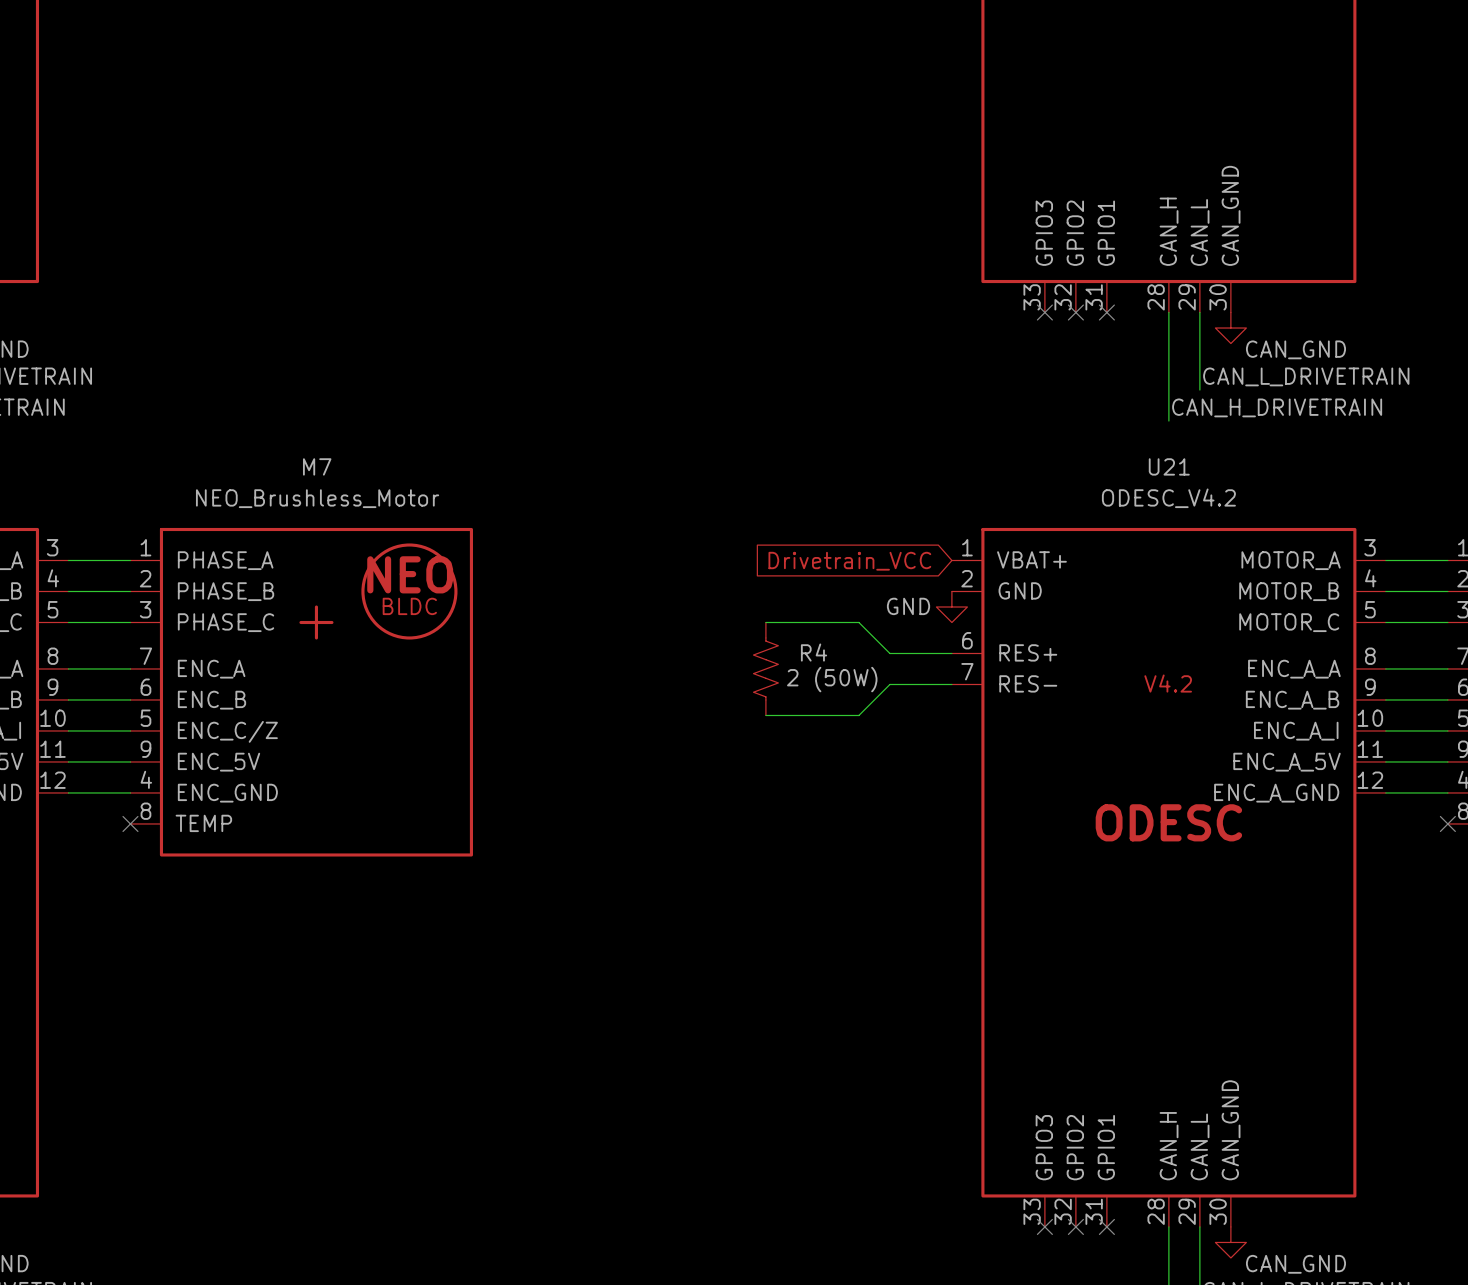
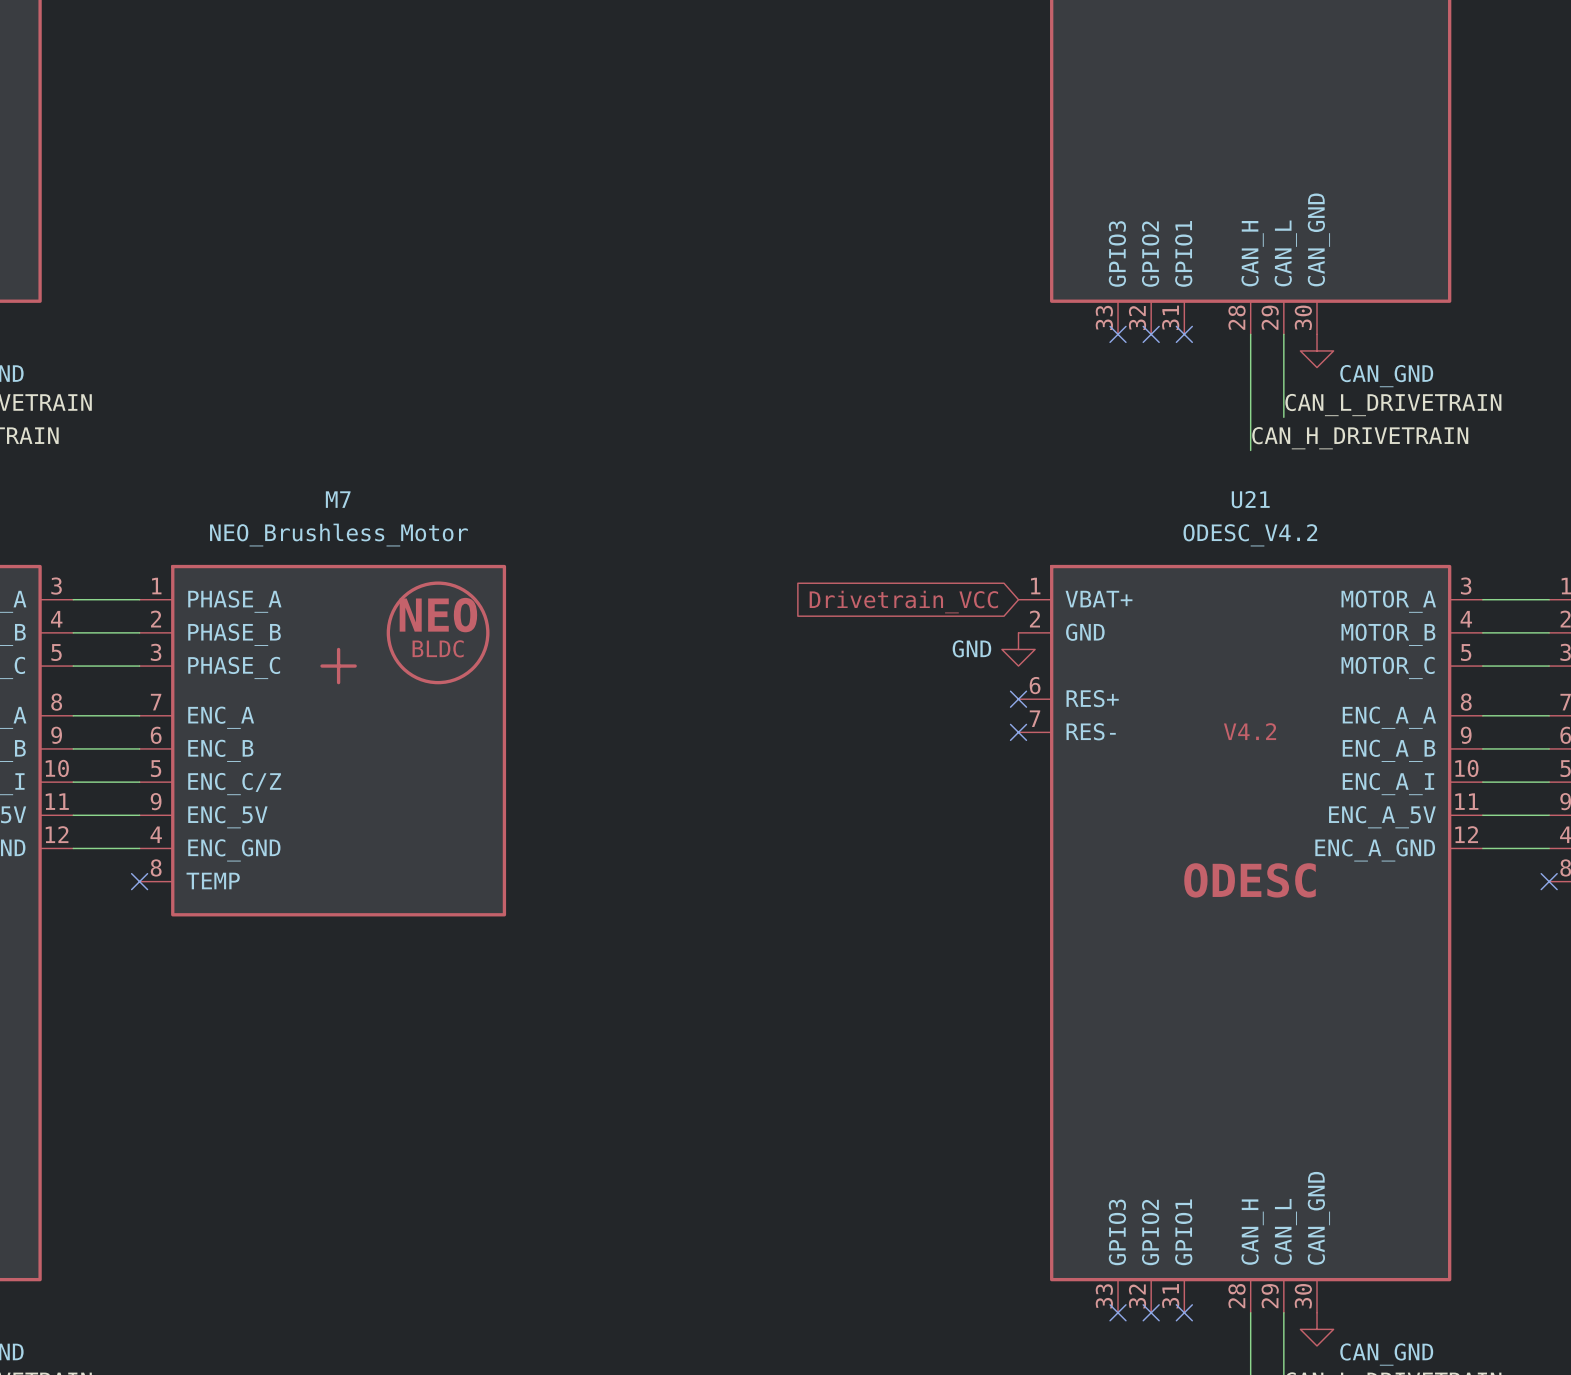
wire: (765, 622) (858, 622) (889, 653) (951, 653) -> none
no-connect mark: none -> (1018, 699)
R4: 2 (50W) (765, 668) -> none
wire: (951, 684) (889, 684) (858, 715) (765, 715) -> none
no-connect mark: none -> (1018, 732)

